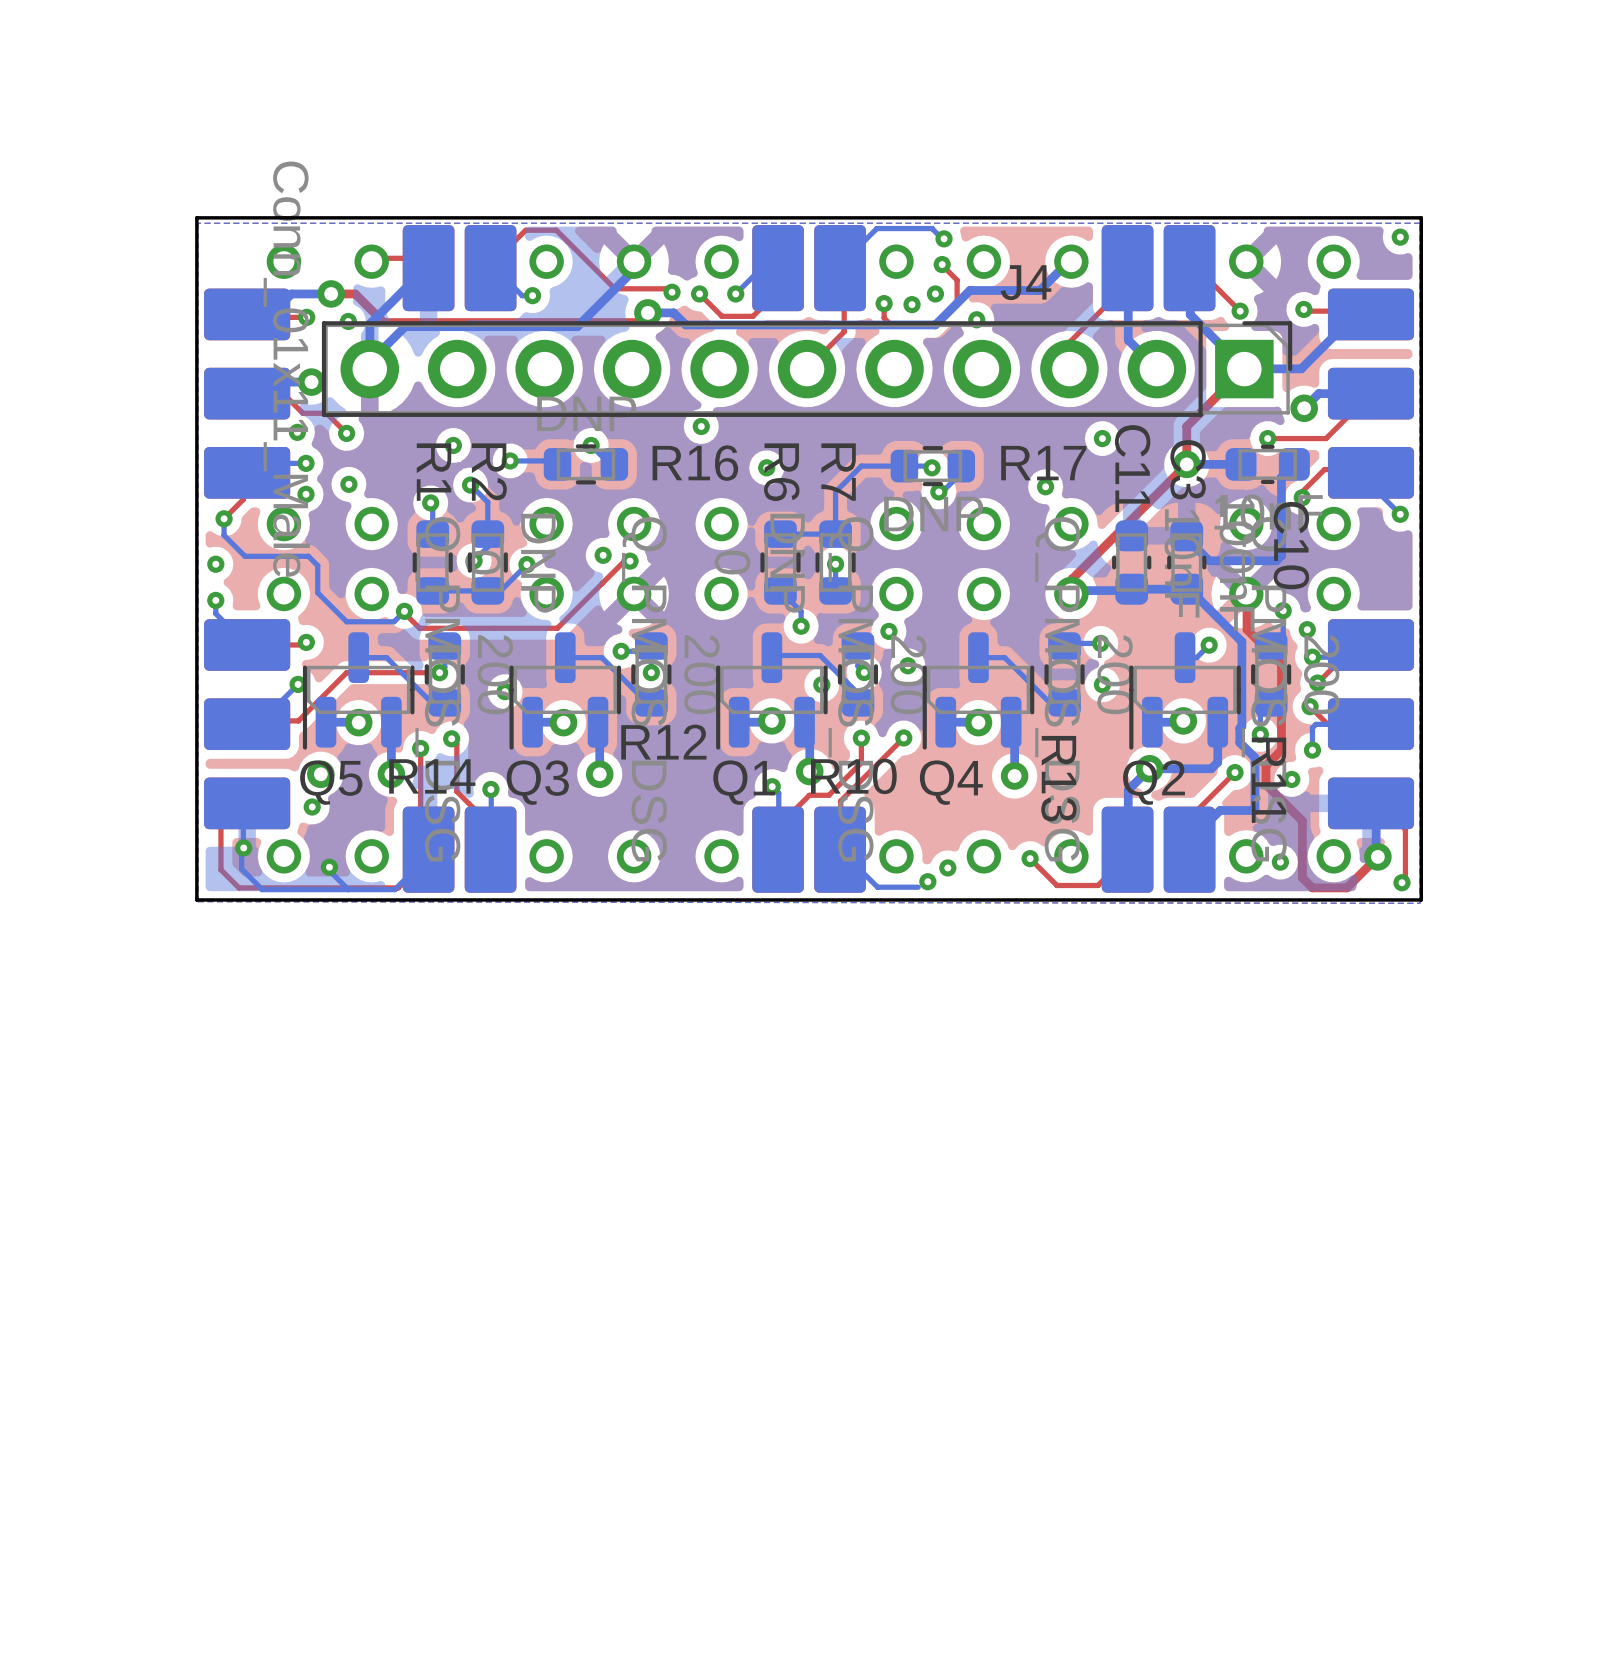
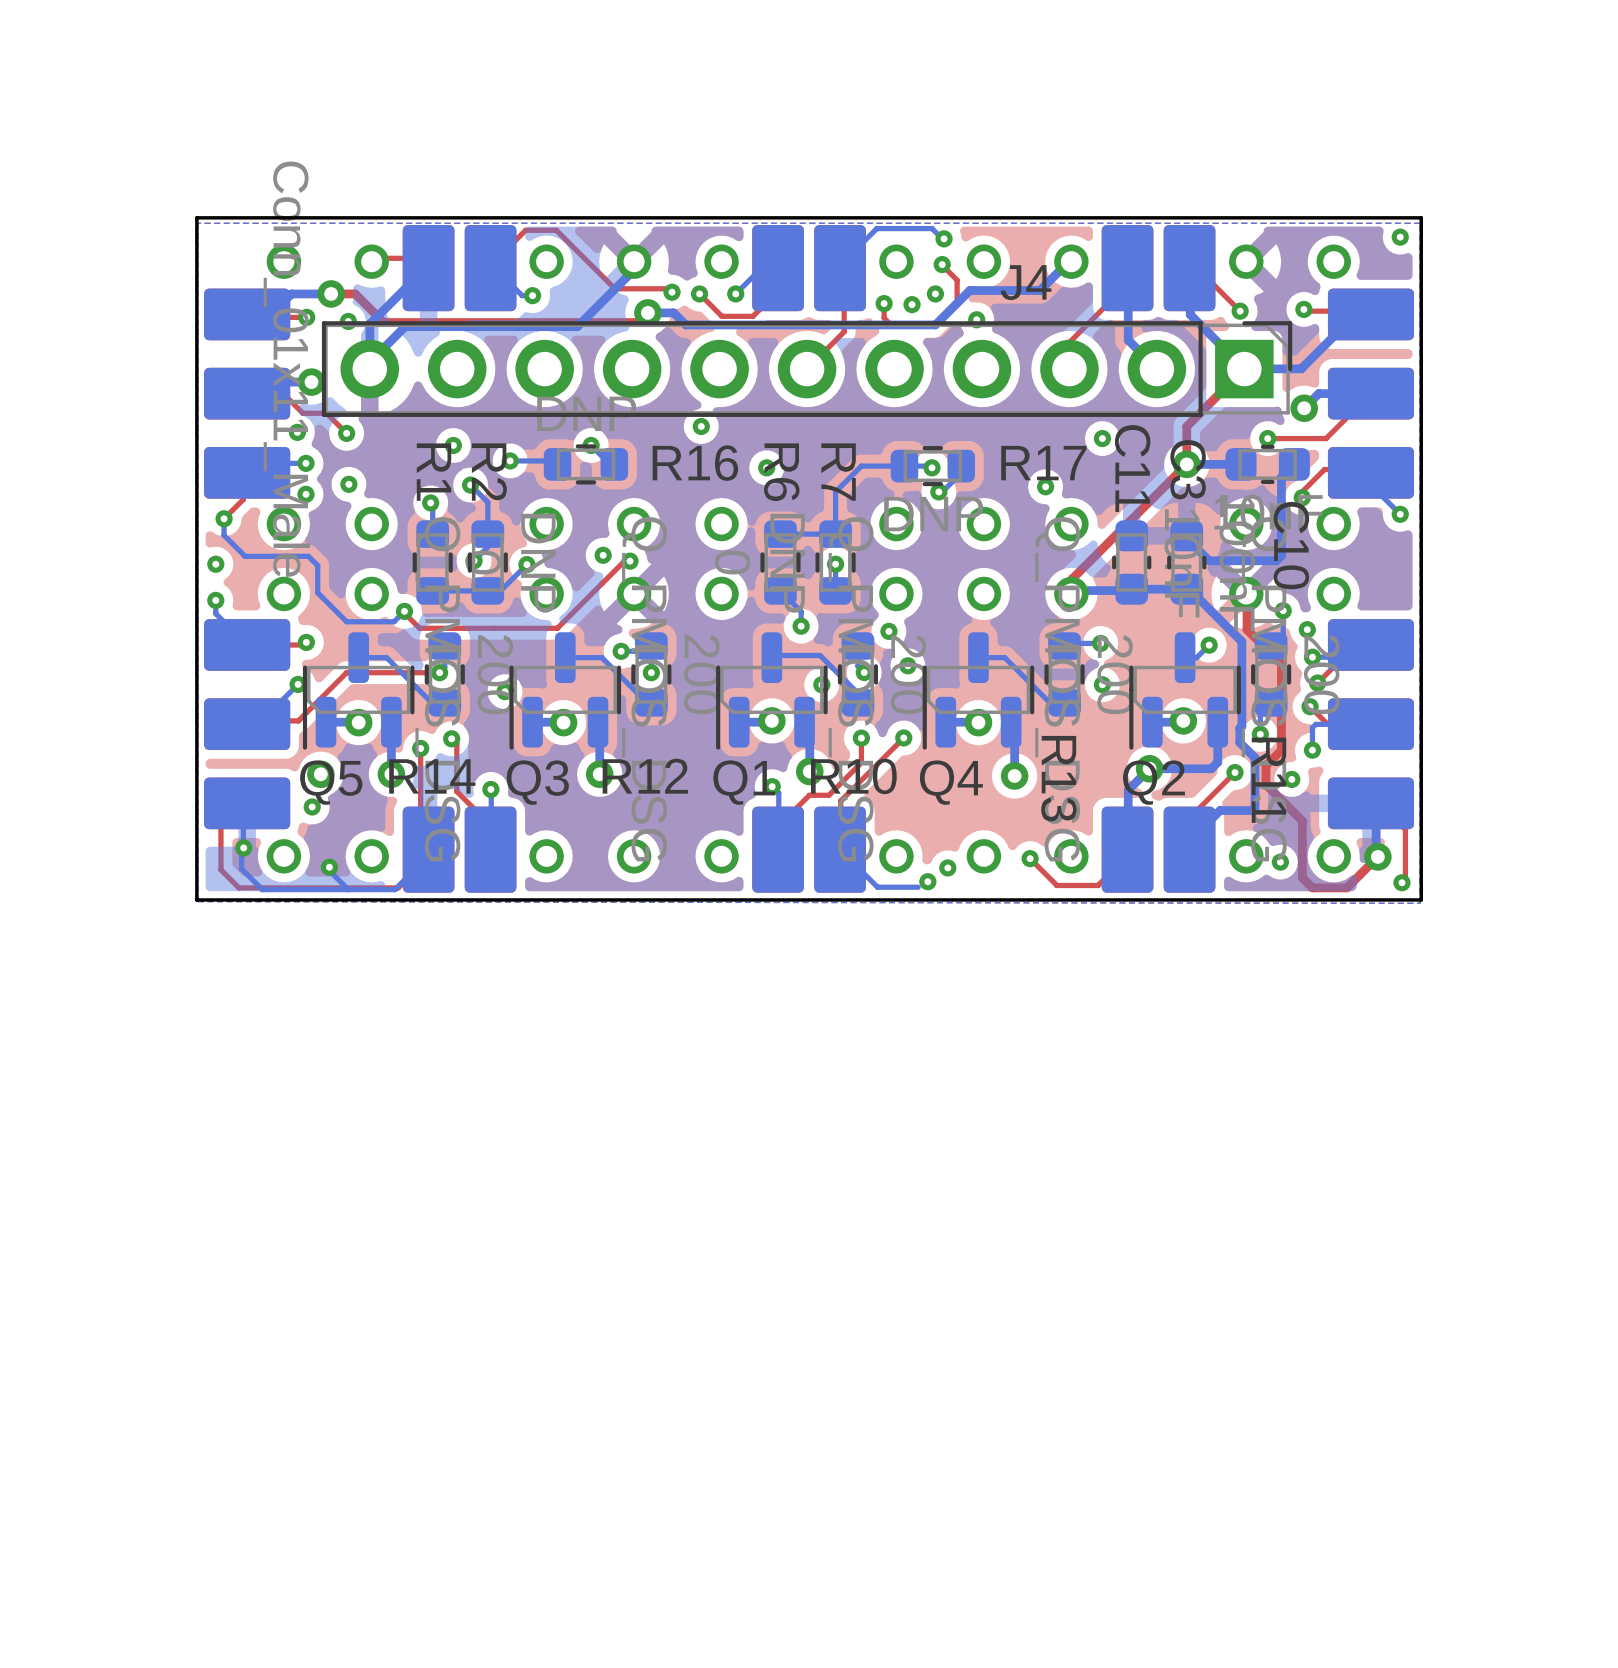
R12 name position: R12 (663, 742) -> R12 (645, 776)

